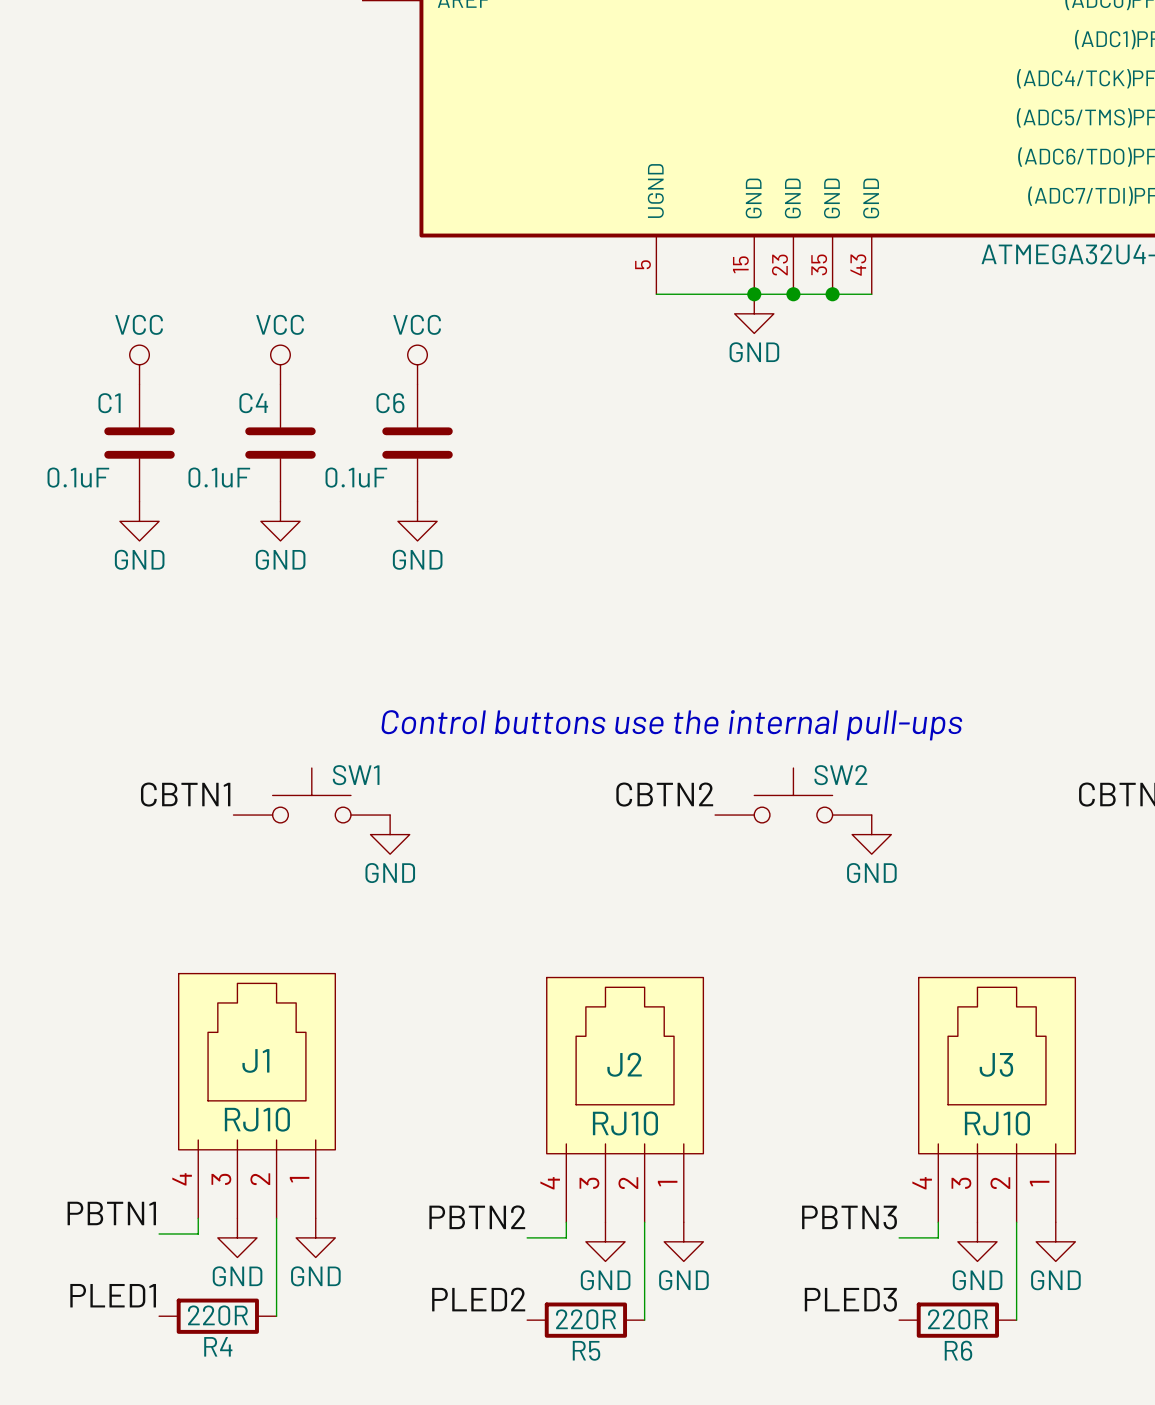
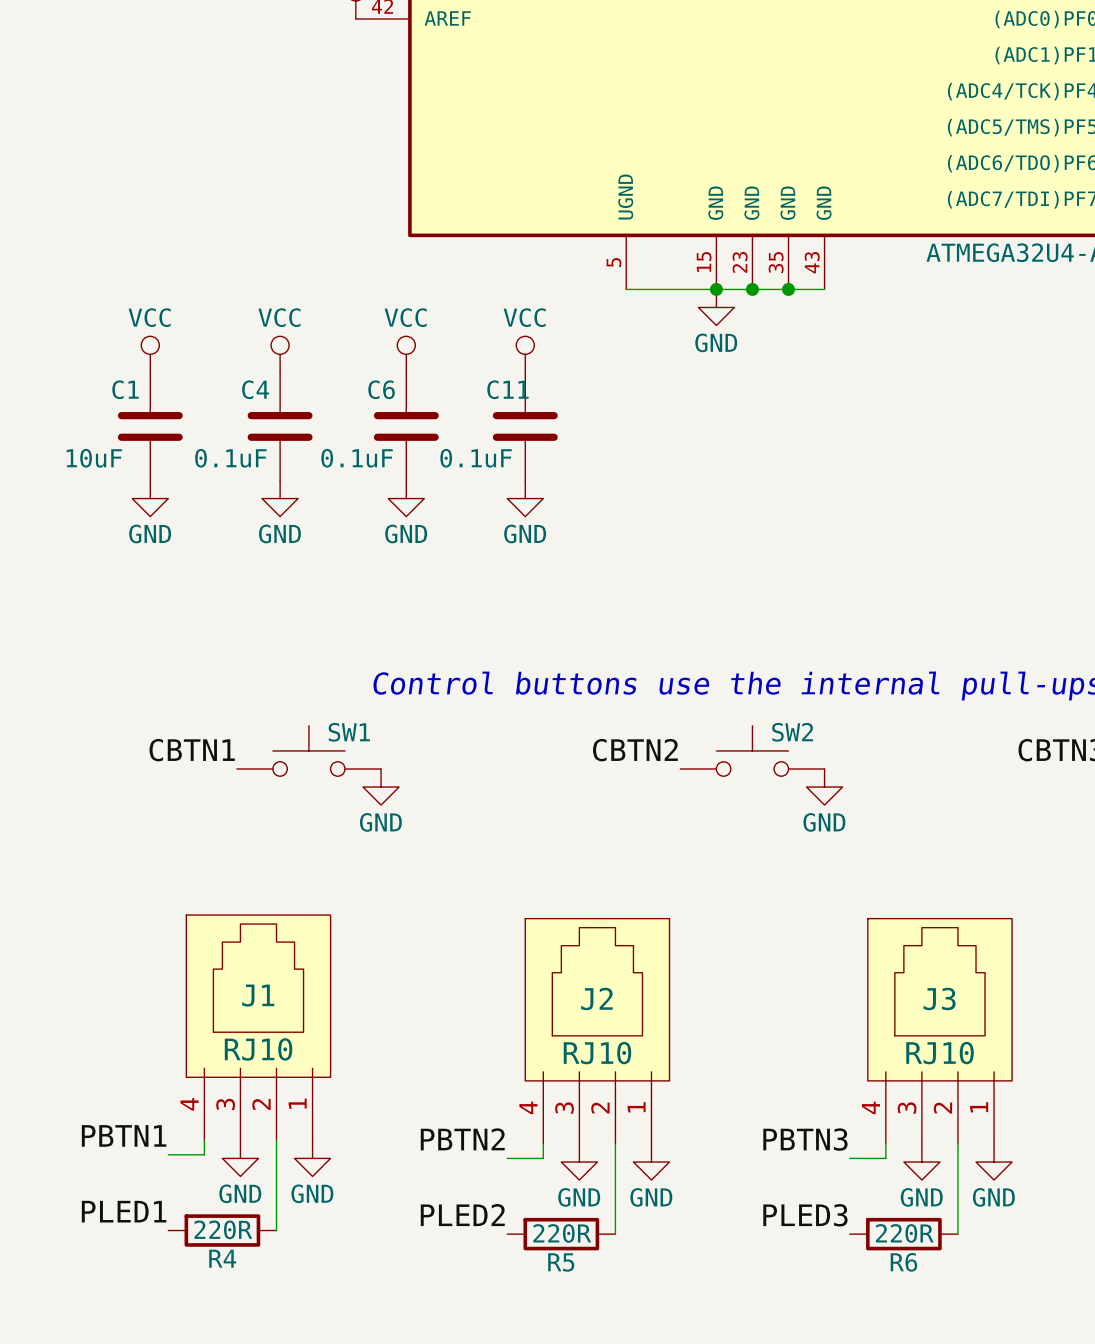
power symbol: none -> VCC (525, 354)
C11: none -> 0.1uF (525, 426)
C1 value: 0.1uF (78, 477) -> 10uF (94, 458)
power symbol: none -> GND (525, 498)

